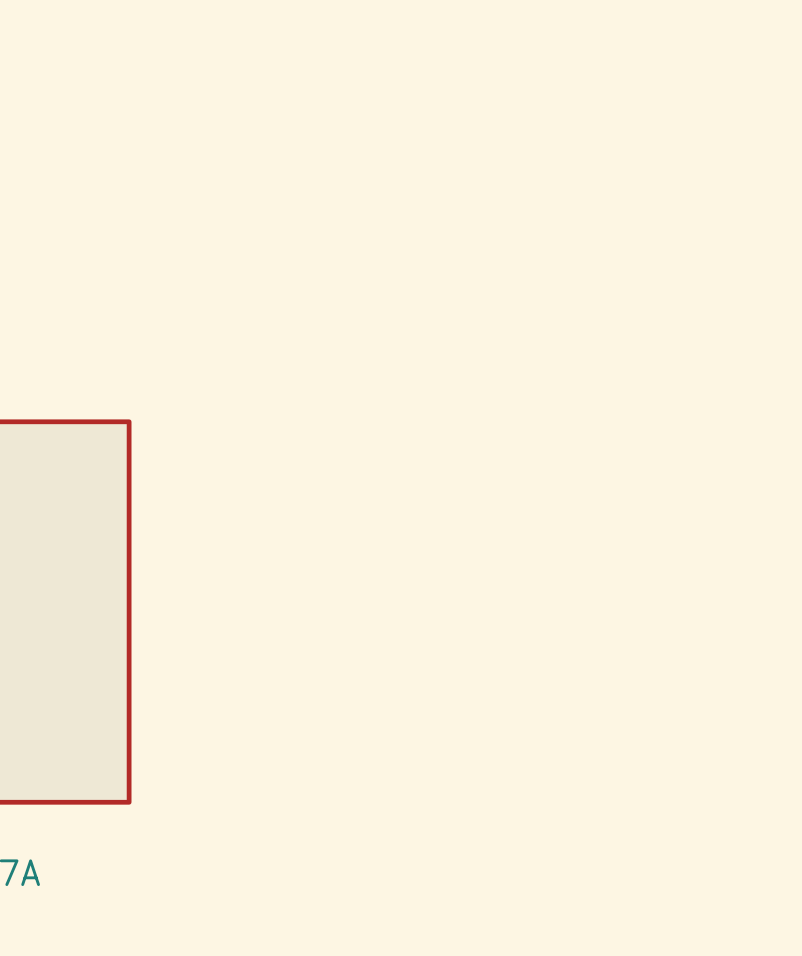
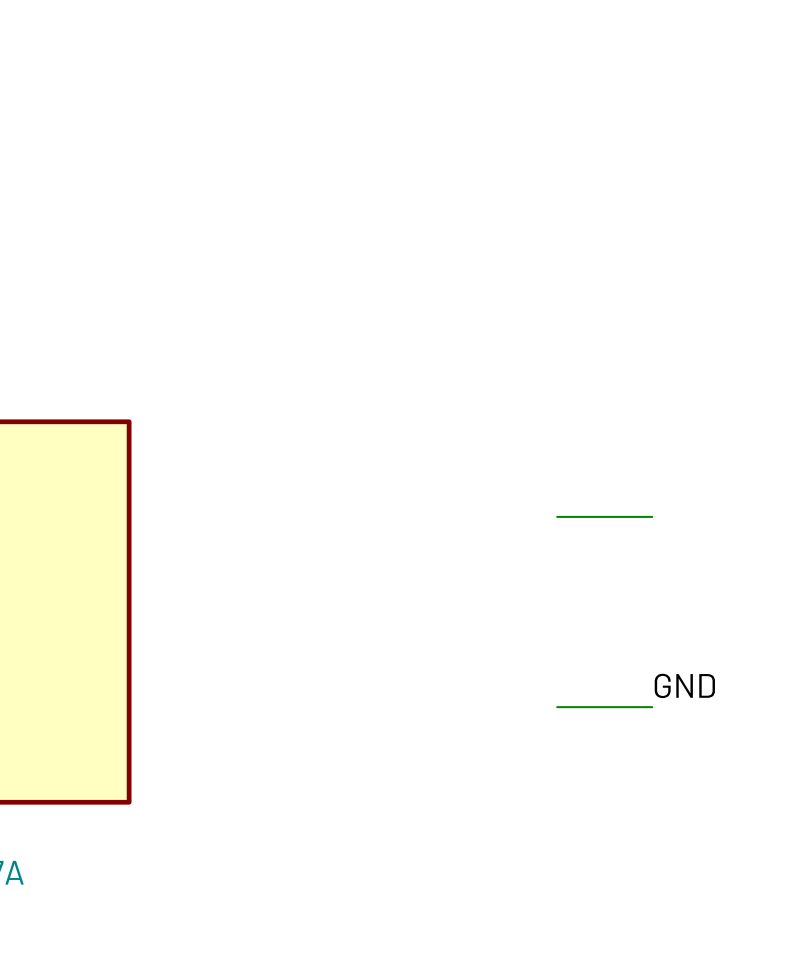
wire: none -> (557, 516) (652, 516)
label: none -> GND (684, 685)
wire: none -> (557, 707) (652, 707)

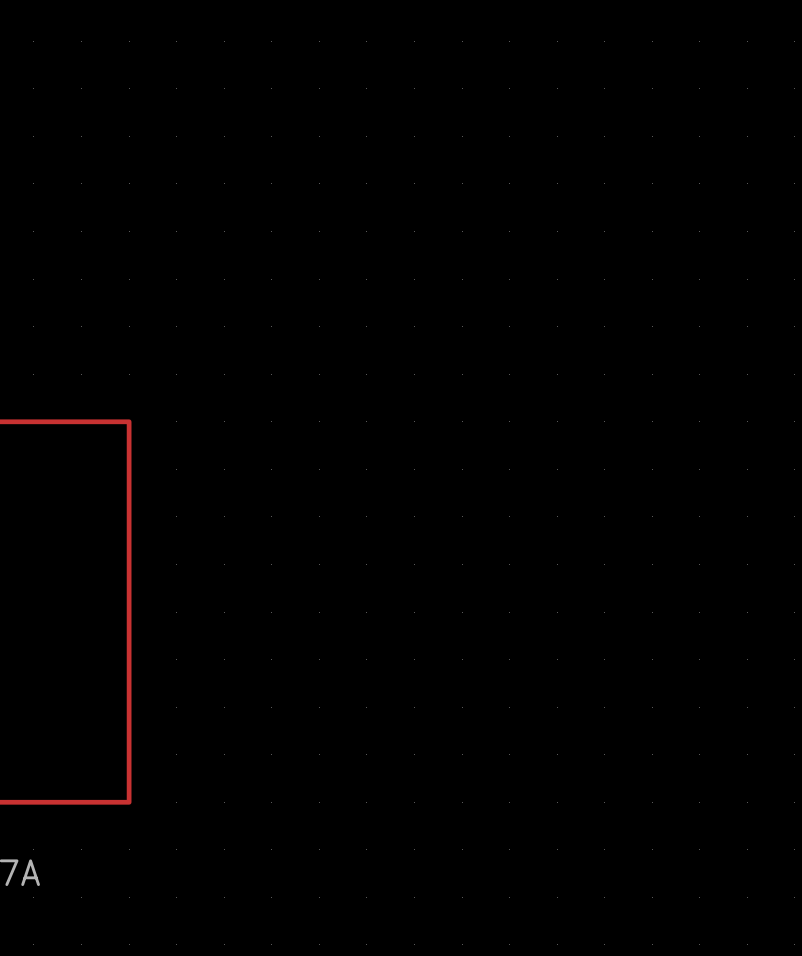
wire: (557, 516) (652, 516) -> none
label: GND (684, 685) -> none
wire: (557, 707) (652, 707) -> none

